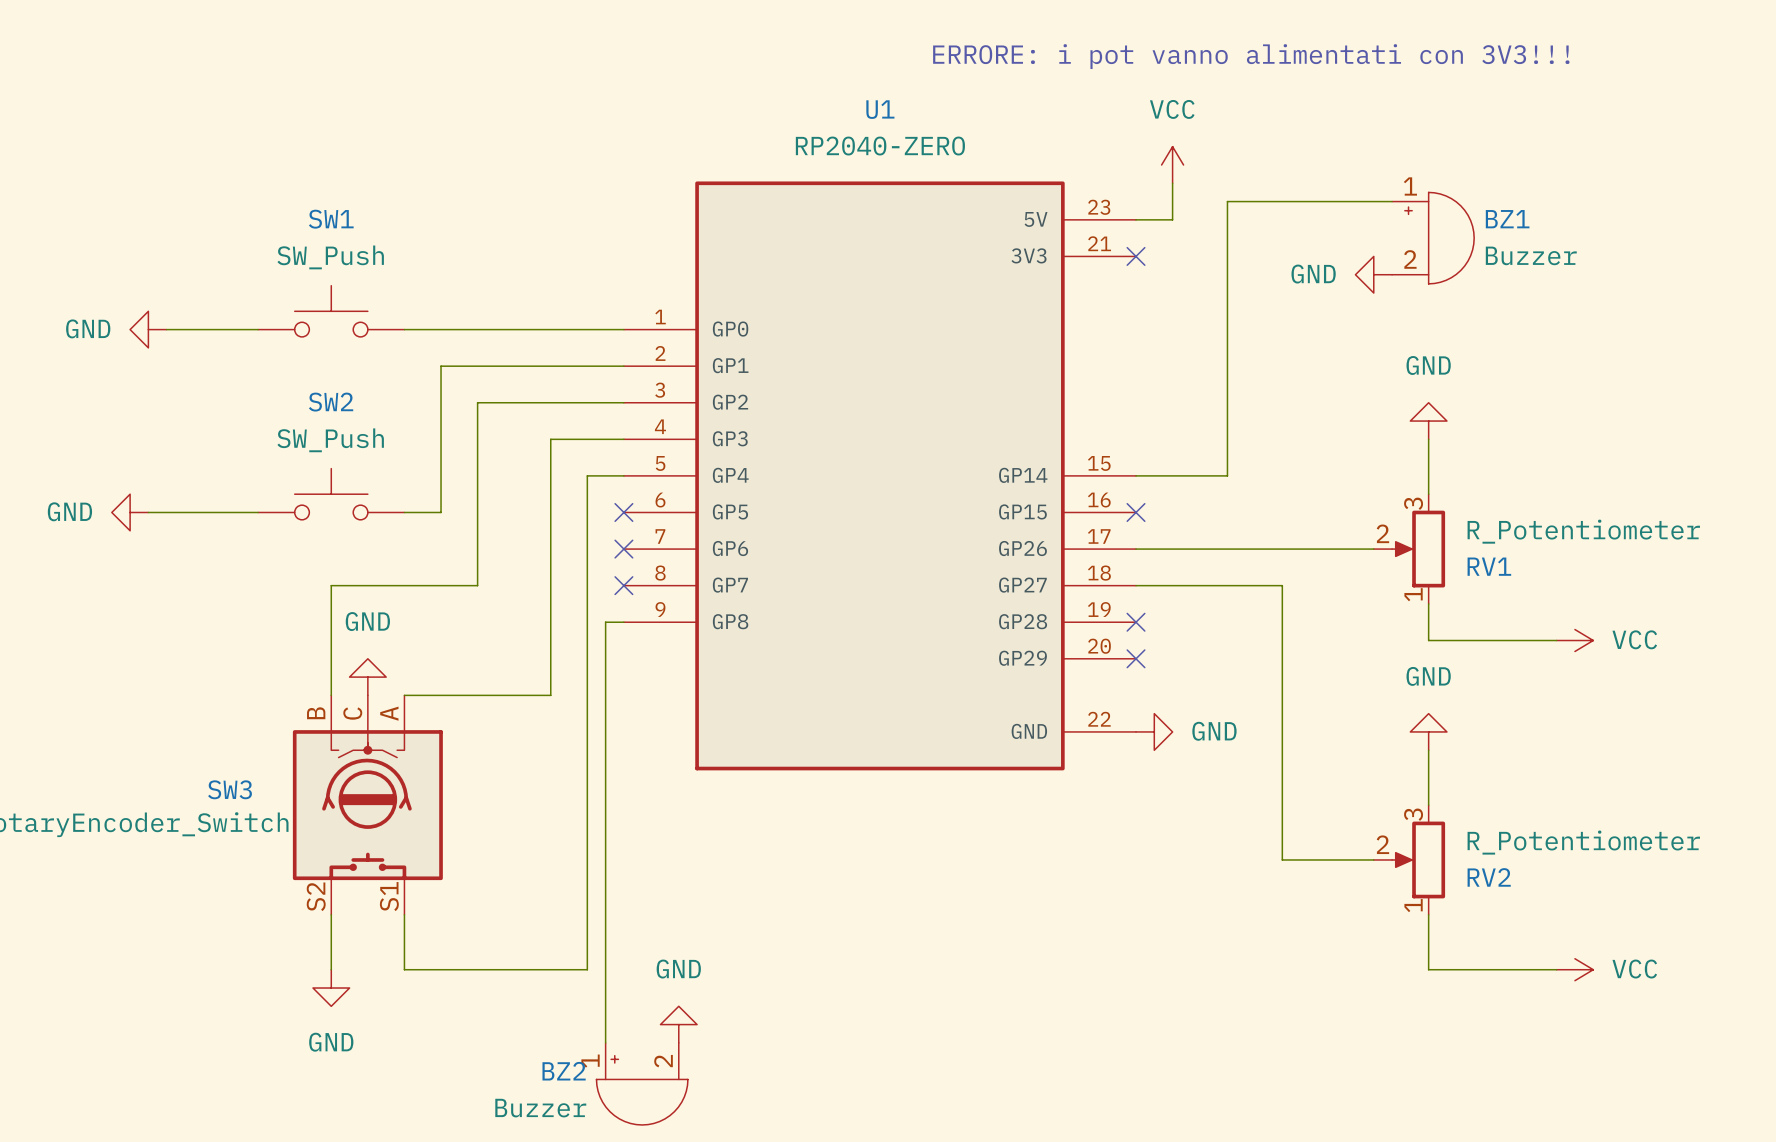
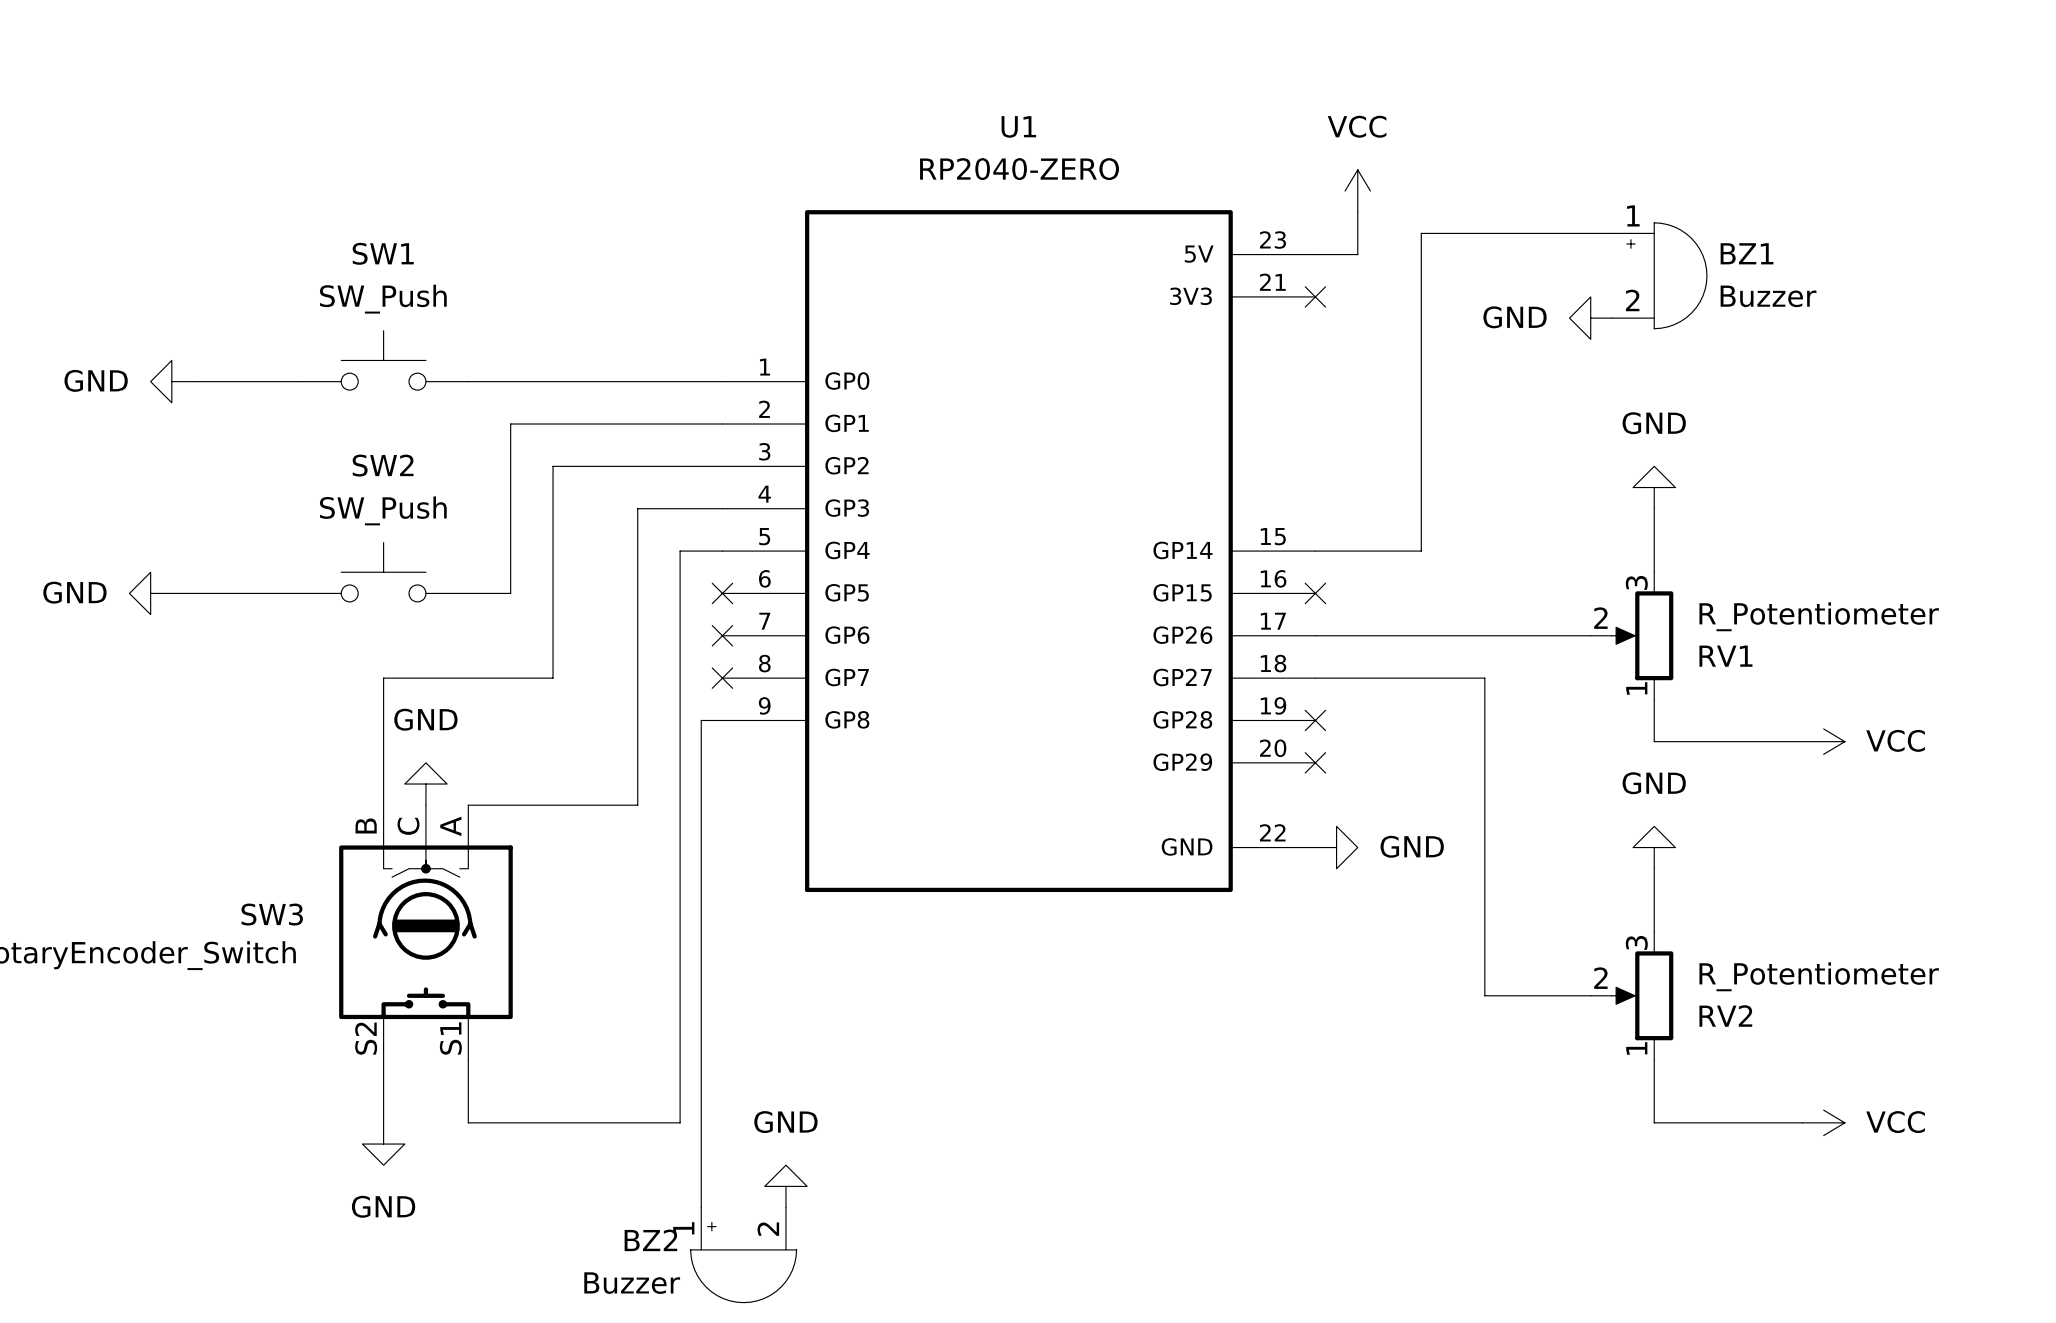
text: ERRORE: i pot vanno alimentati con 3V3!!! (1251, 56) -> none

